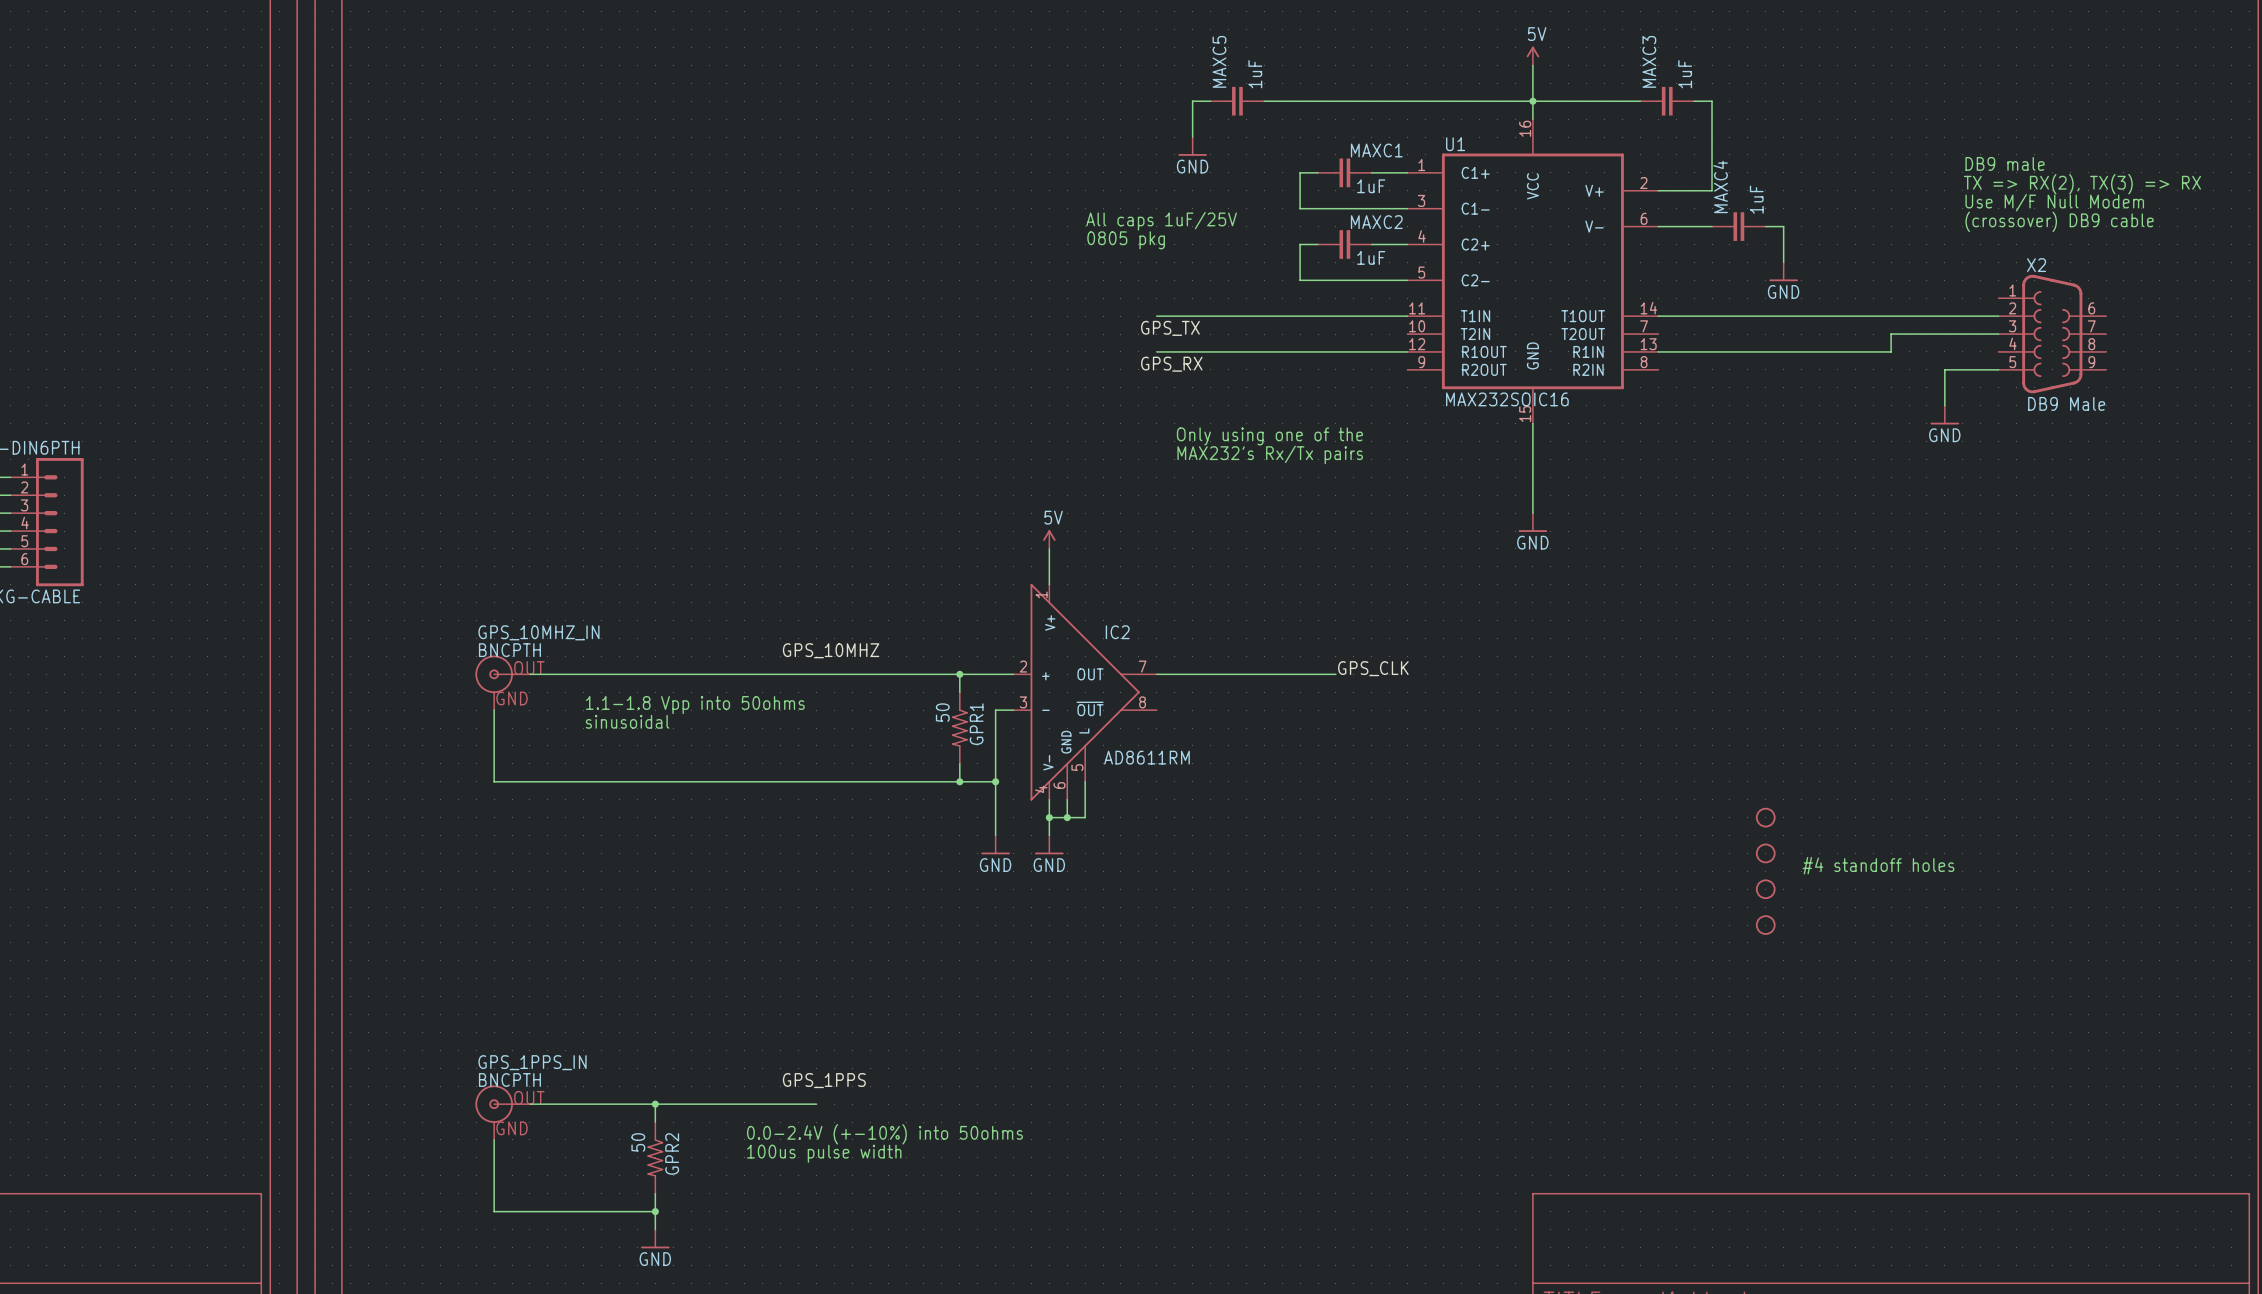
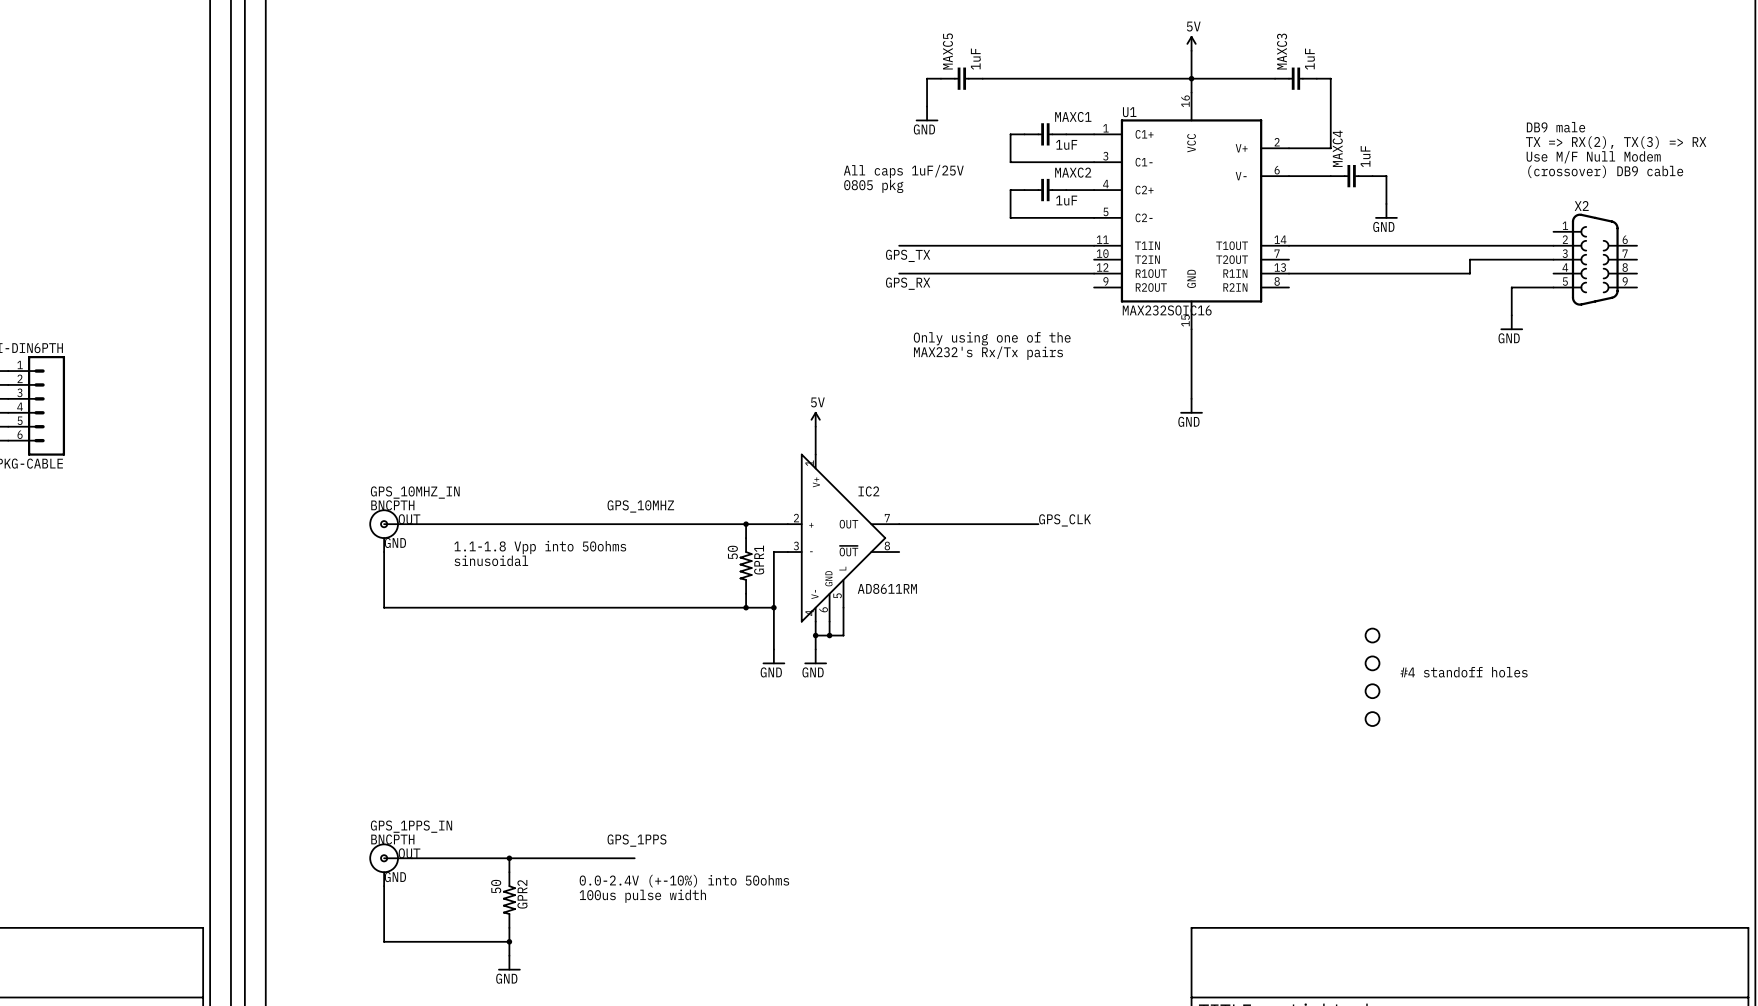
X2 value: DB9 Male (2066, 403) -> none

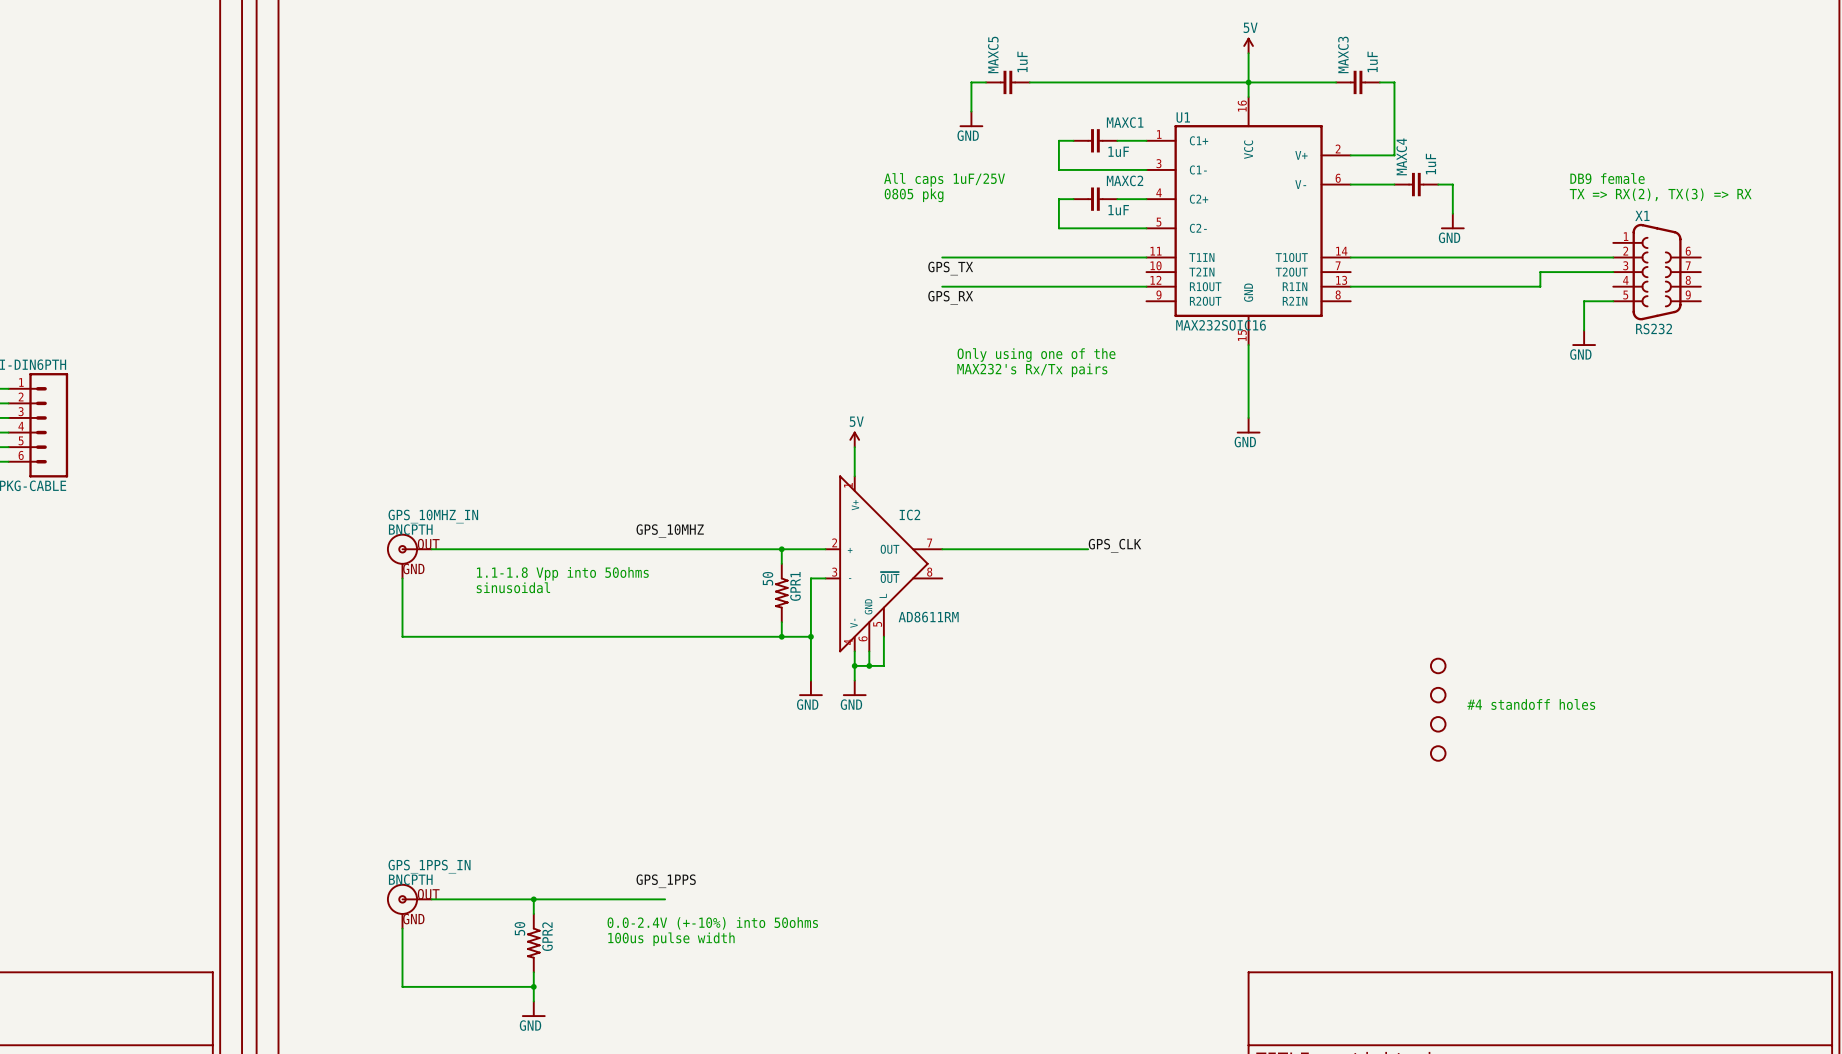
text: DB9 male (1555, 127) -> none
text position: TX => RX(2), TX(3) => RX (1616, 142) -> TX => RX(2), TX(3) => RX (1660, 194)
text: Use M/F Null Modem (1593, 157) -> none
text: none -> DB9 female (1607, 178)
text: (crossover) DB9 cable (1605, 171) -> none
X1: none -> RS232 (1657, 272)
X2: (1595, 259) -> none

